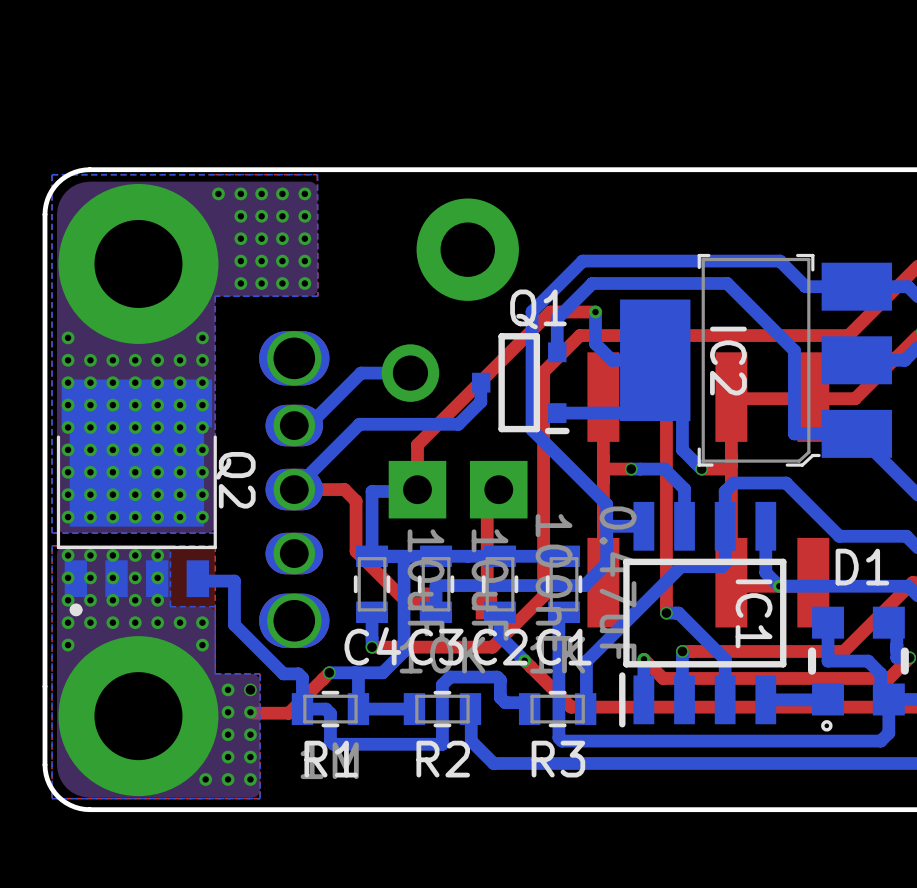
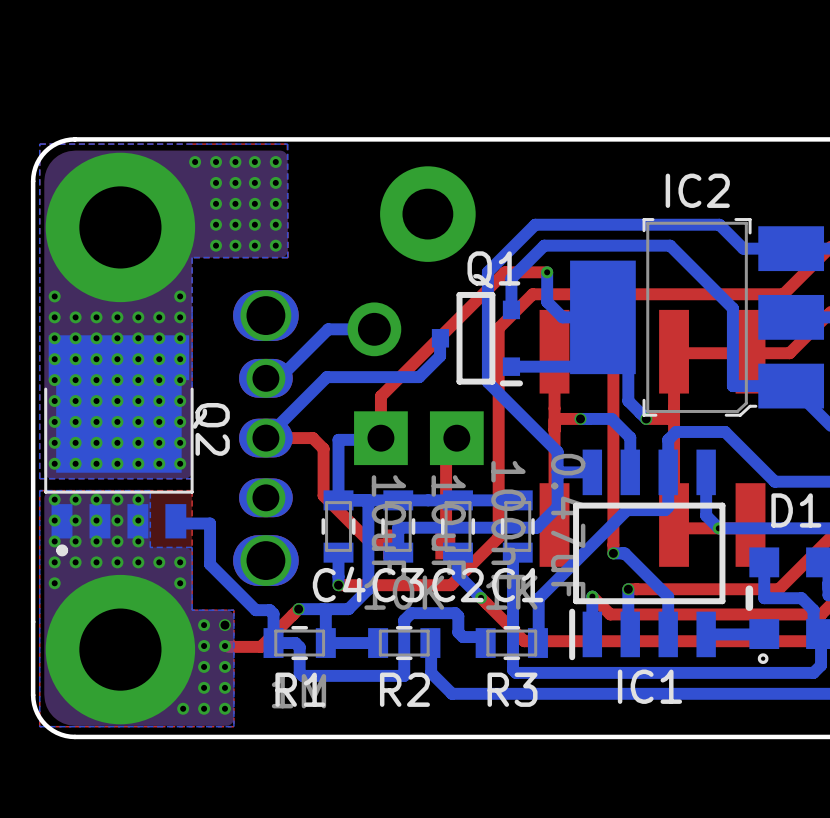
IC2 name rotation: 0° (728, 361) -> 90° counterclockwise (697, 190)
IC2 name position: IC2 (728, 361) -> IC2 (697, 190)
IC1 name rotation: 0° (754, 613) -> 90° counterclockwise (649, 686)
IC1 name position: IC1 (754, 613) -> IC1 (649, 686)

